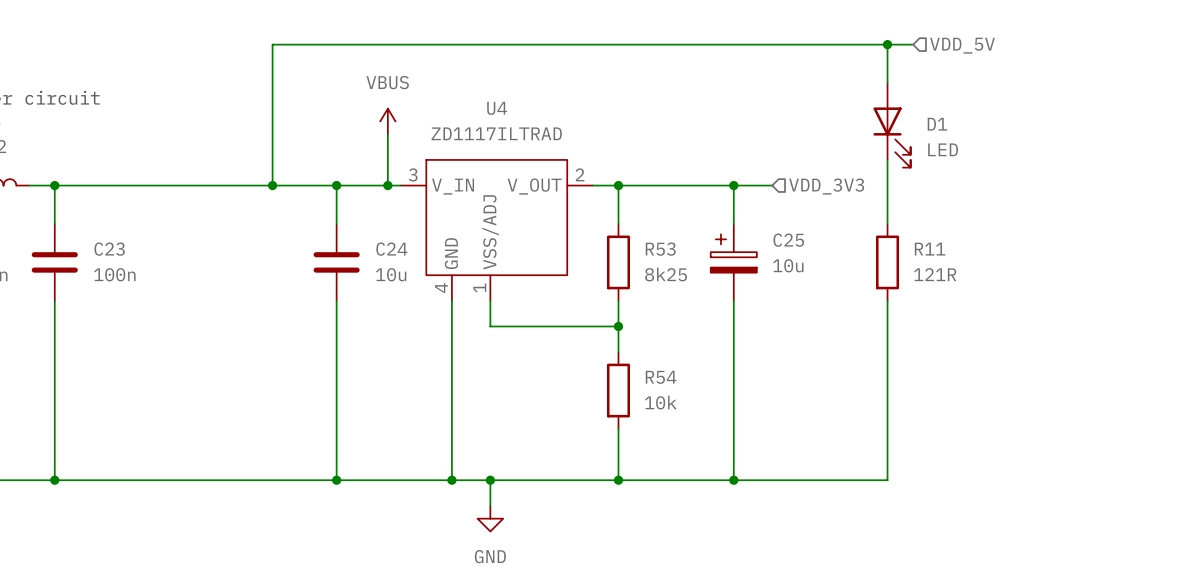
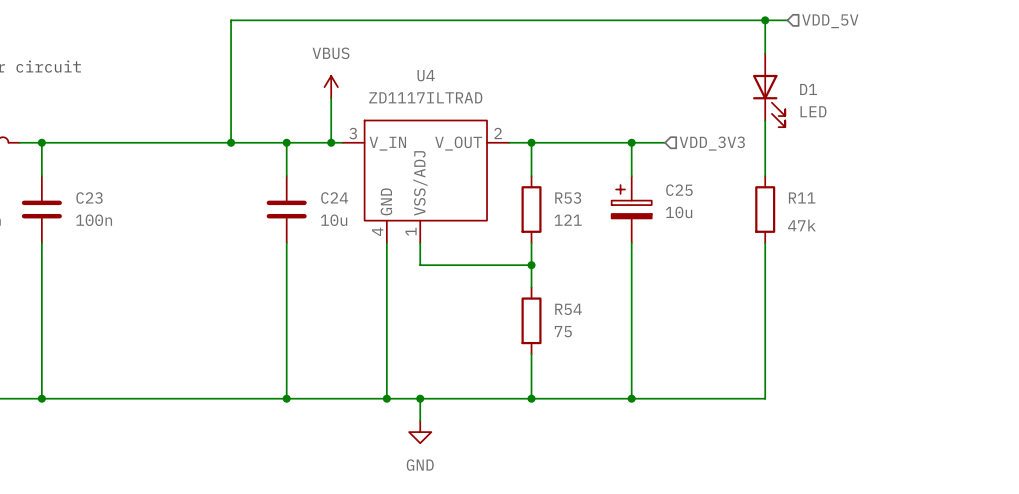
R53 value: 8k25 (666, 274) -> 121 (568, 220)
R11 value: 121R (935, 274) -> 47k (801, 225)
R54 value: 10k (660, 402) -> 75 (563, 331)

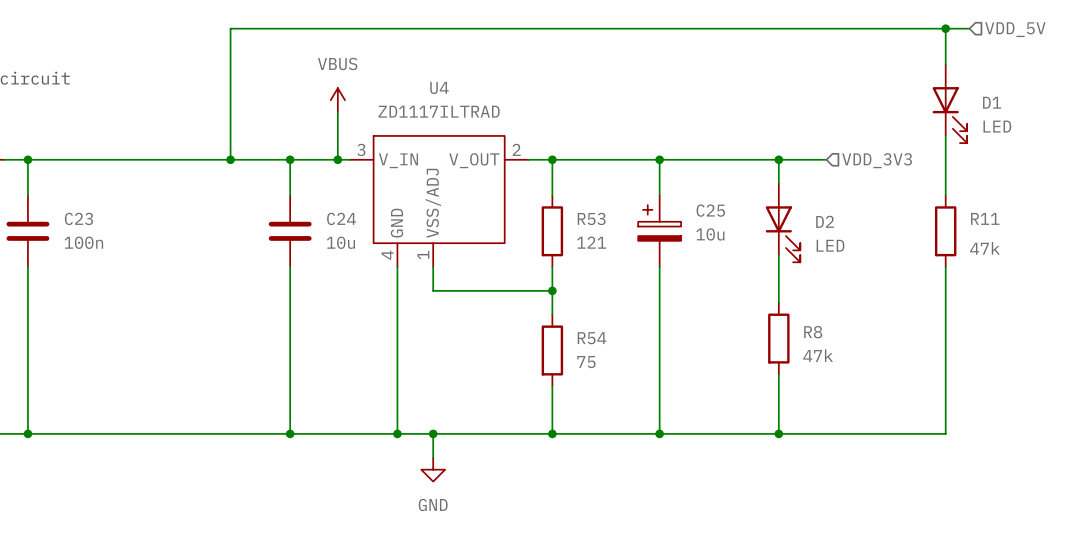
wire: (765, 20) (765, 53) -> (945, 28) (945, 64)
junction: (765, 20) -> none
wire: none -> (826, 28) (969, 28)
junction: none -> (945, 28)
hierarchical label position: VDD_5V (830, 21) -> VDD_5V (1015, 29)
D1 position: (769, 90) -> (949, 103)
wire: (765, 120) (765, 176) -> (945, 135) (945, 195)
wire: none -> (695, 159) (826, 159)
wire: none -> (778, 159) (778, 183)
junction: none -> (778, 159)
hierarchical label position: VDD_3V3 (712, 143) -> VDD_3V3 (877, 160)
D2: none -> LED (783, 222)
R11 position: (765, 209) -> (945, 231)
wire: none -> (778, 255) (778, 302)
wire: (765, 242) (765, 398) -> (945, 267) (945, 433) (802, 433)
R8: none -> 47k (778, 338)
wire: none -> (778, 374) (778, 433)
junction: none -> (778, 433)

